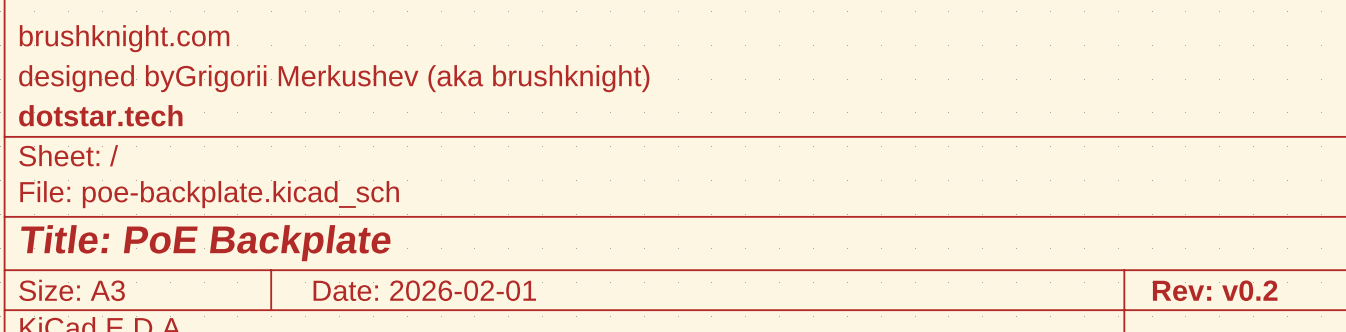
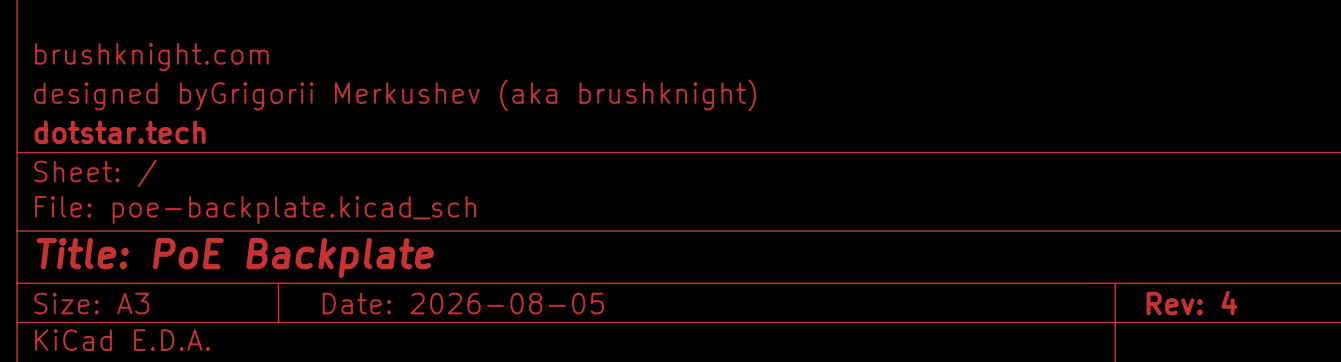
title block: Date: 2026-02-01 (424, 290) -> Date: 2026-08-05 (463, 303)
title block: Rev: v0.2 (1215, 290) -> Rev: 4 (1191, 303)

